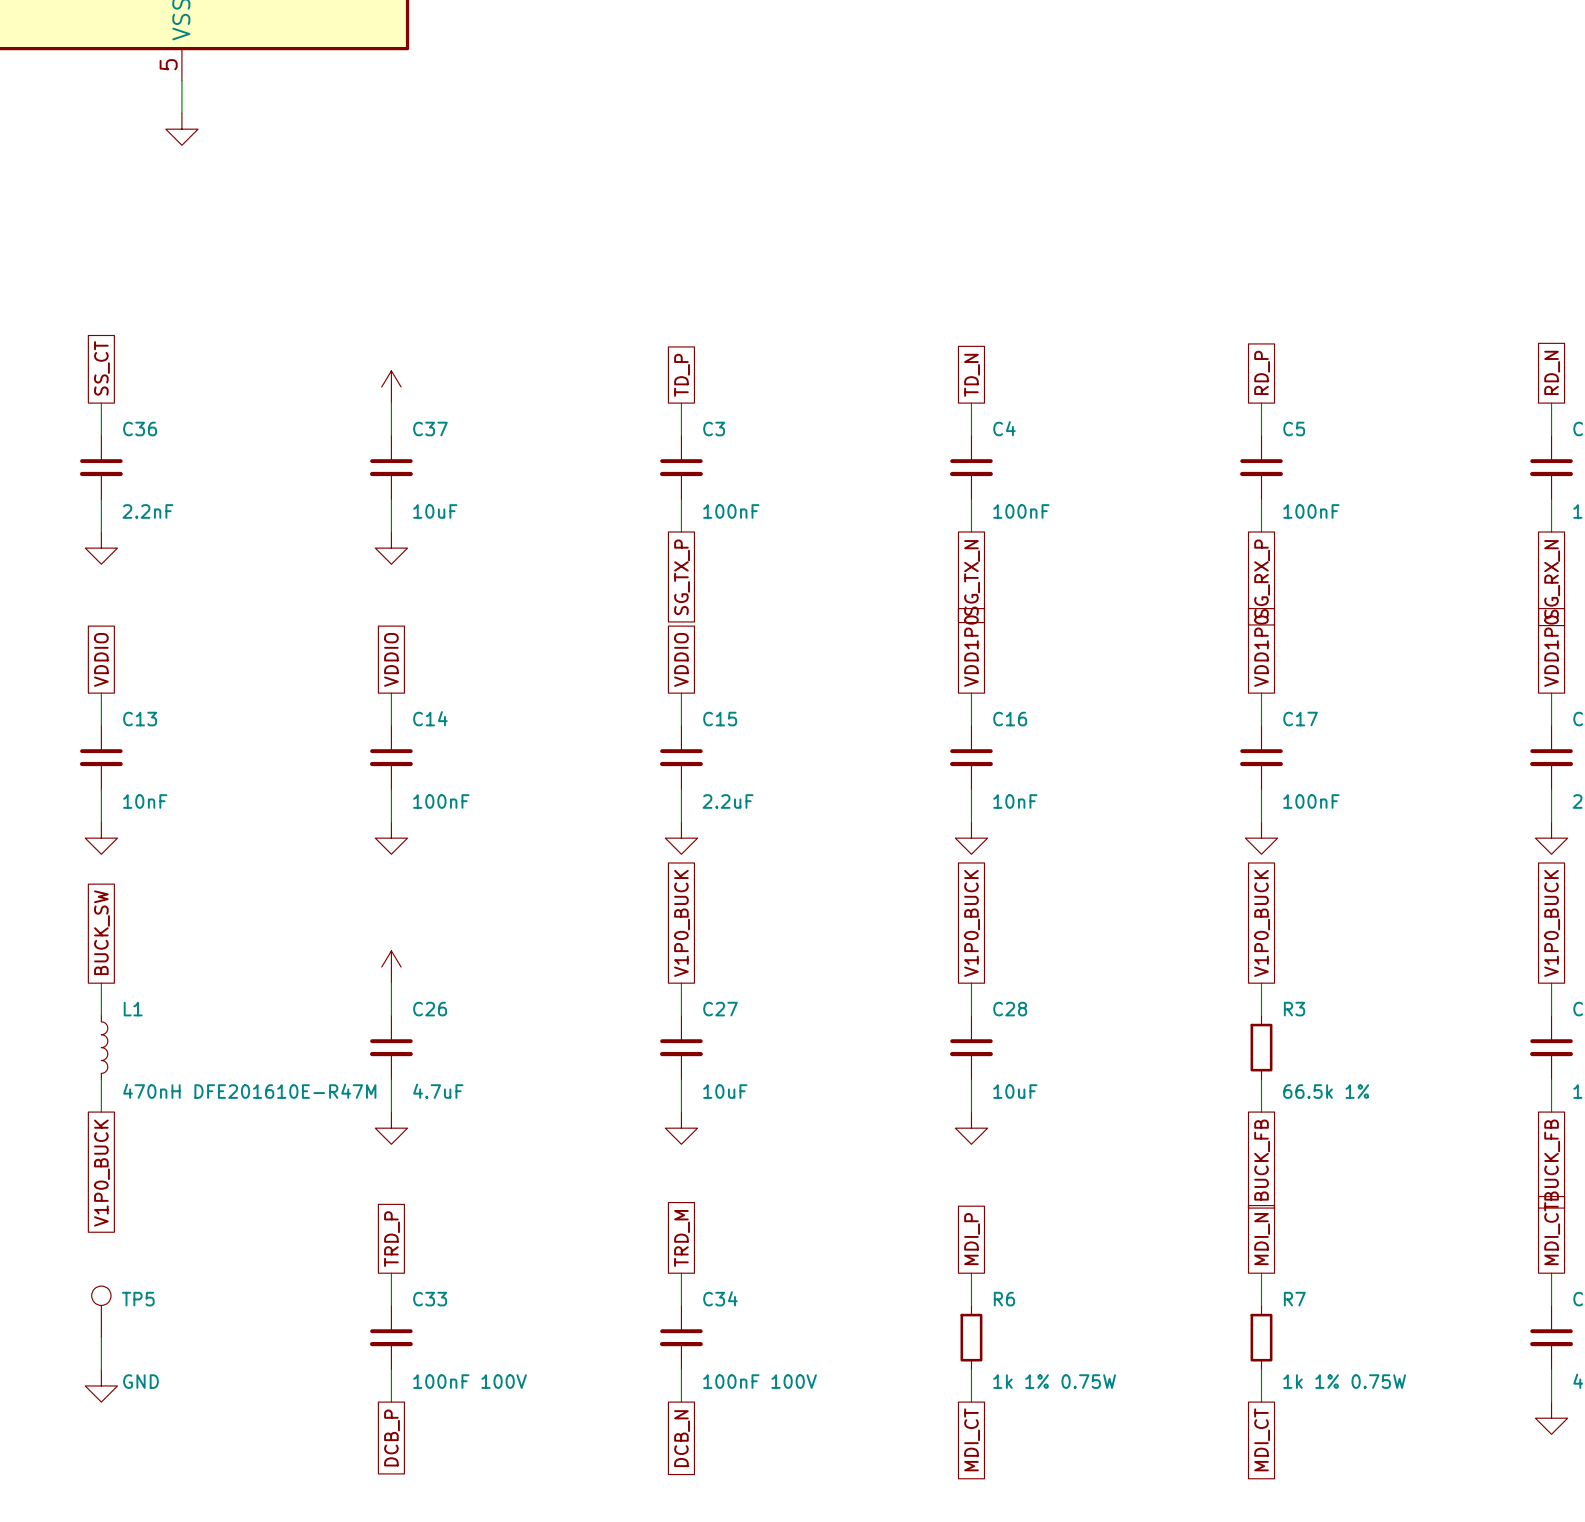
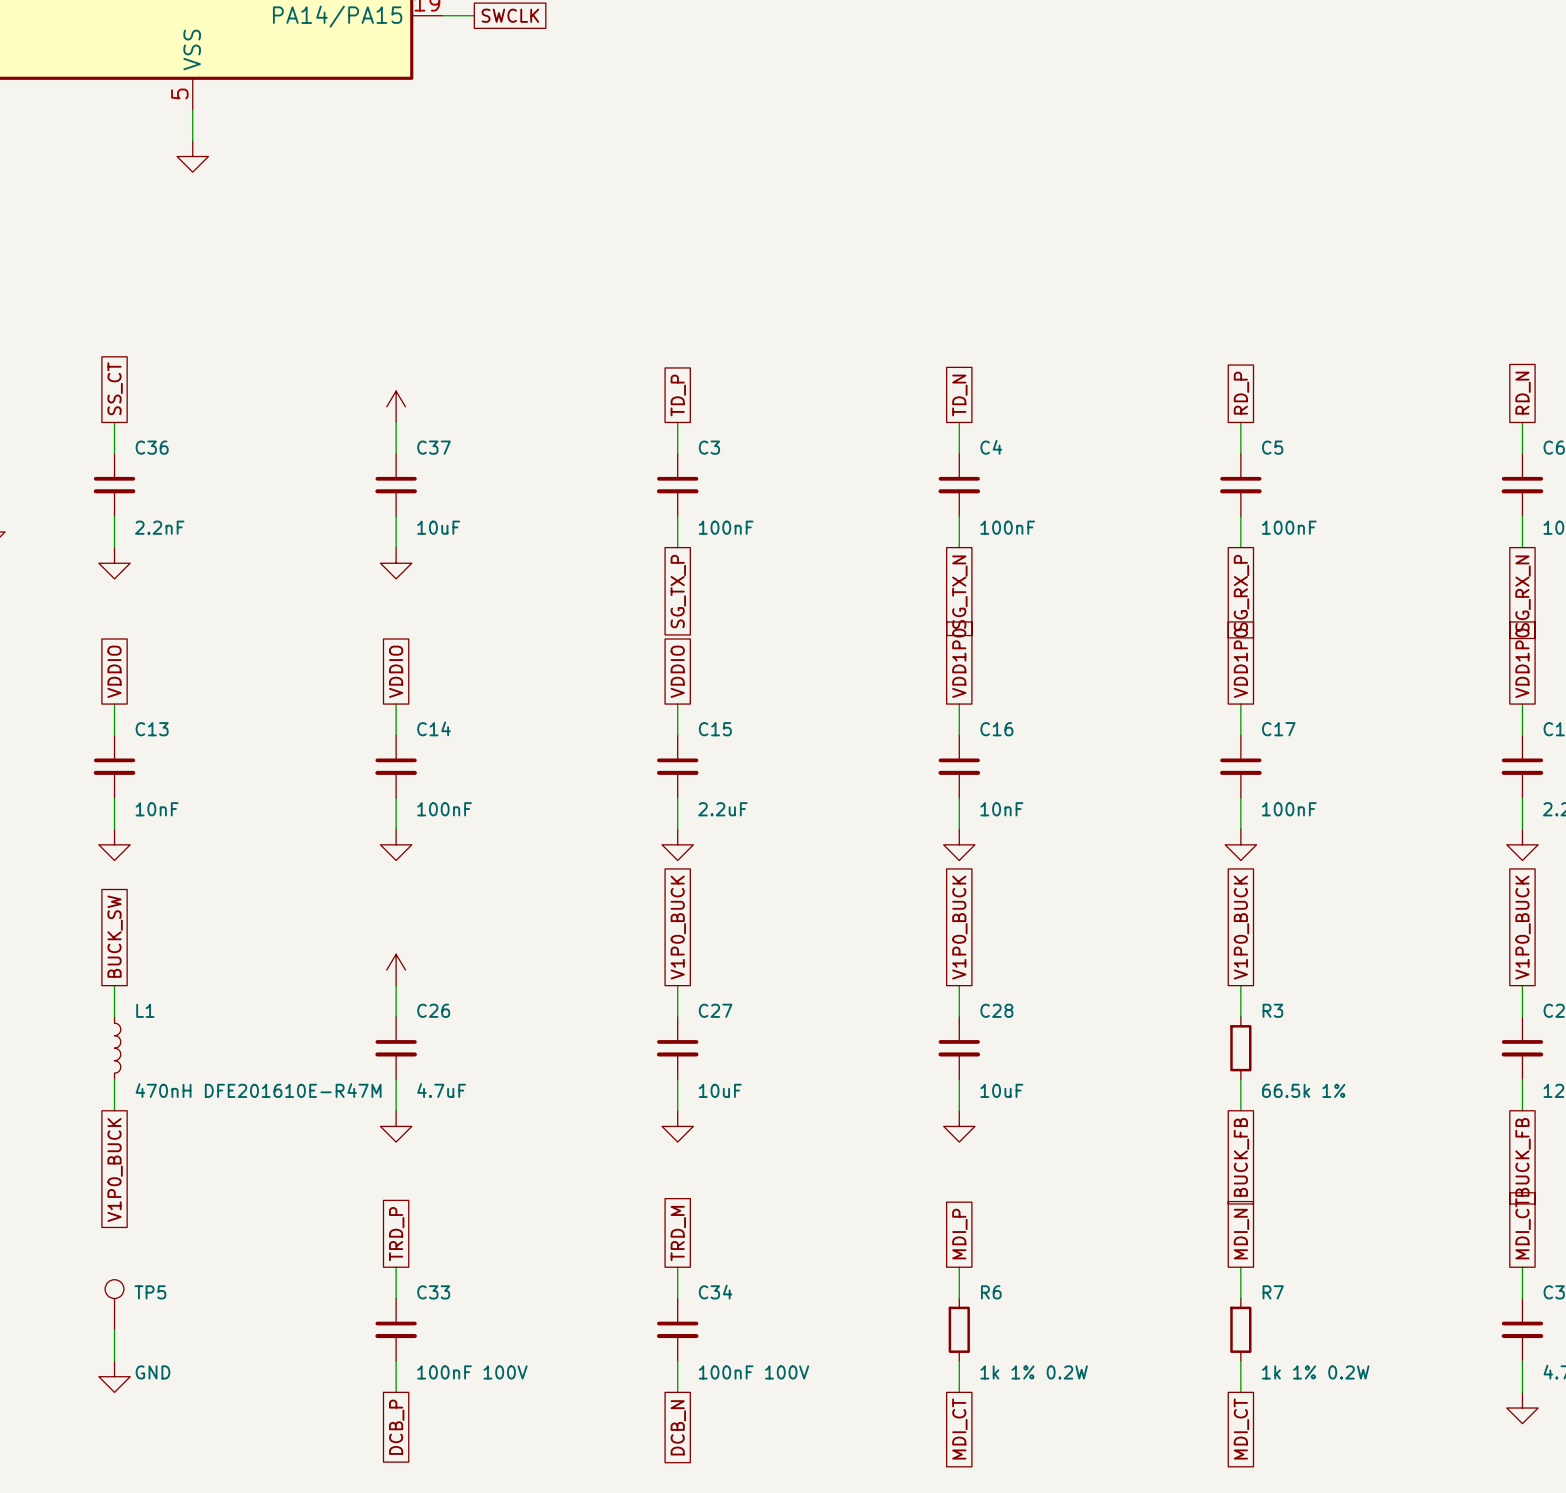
R6 value: 1k 1% 0.75W (1054, 1381) -> 1k 1% 0.2W (1034, 1372)
R7 value: 1k 1% 0.75W (1344, 1381) -> 1k 1% 0.2W (1315, 1372)

